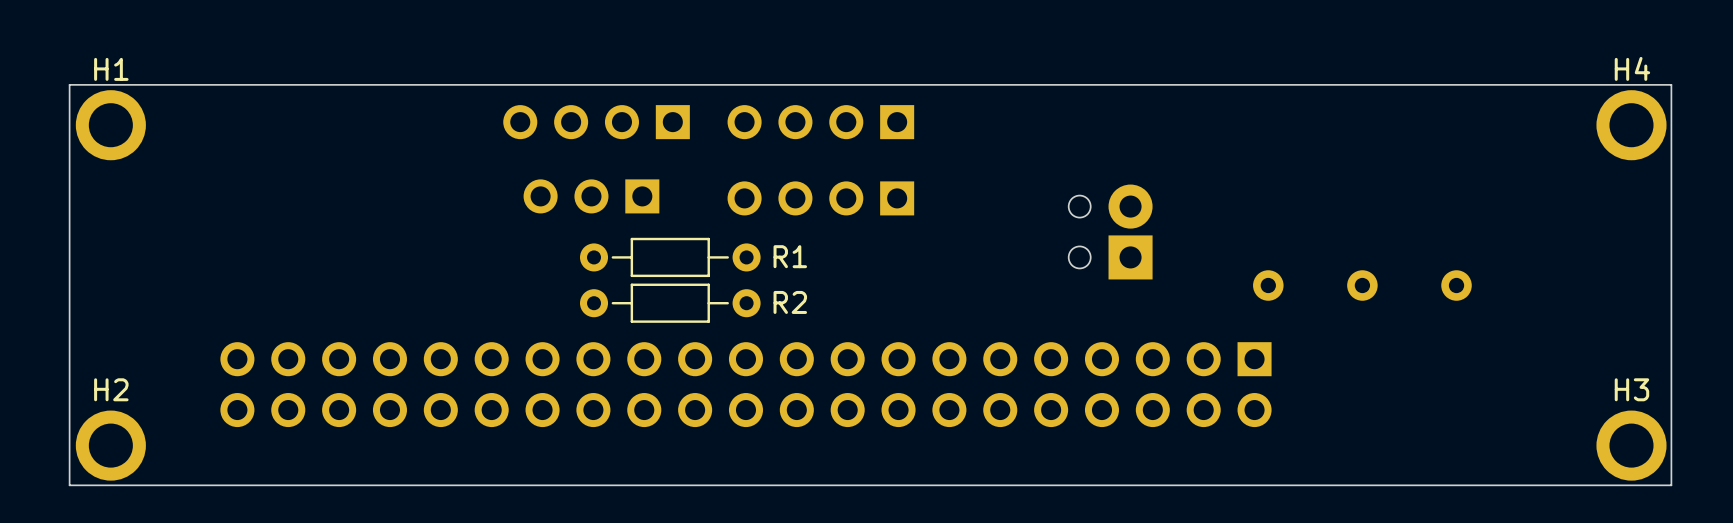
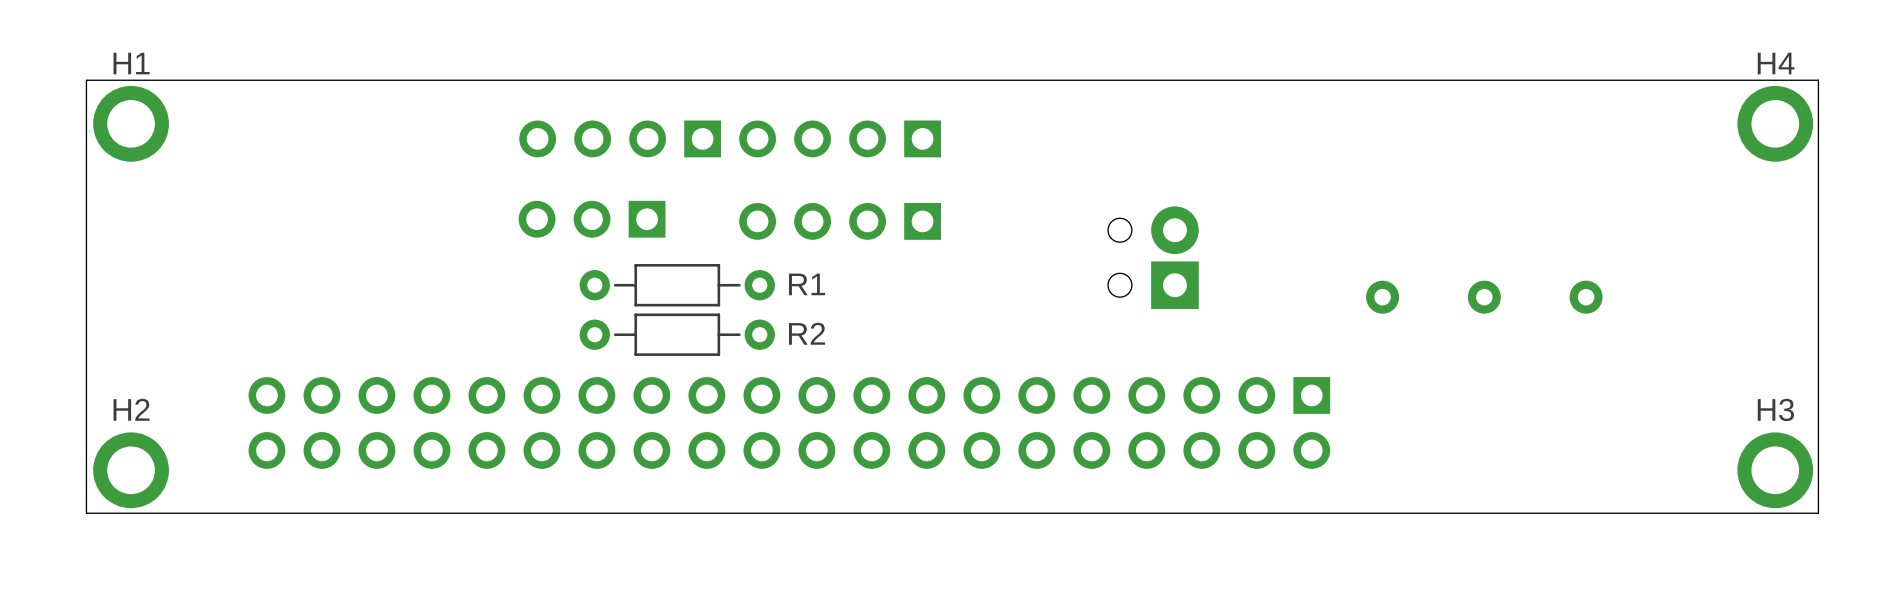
part position: (596, 122) -> (620, 138)
part: (820, 122) -> none
part: none -> (840, 138)
part position: (591, 196) -> (592, 219)
part: (820, 198) -> none
part: none -> (840, 221)
part position: (1110, 232) -> (1153, 257)
R1 position: (670, 257) -> (677, 285)
R2 position: (670, 303) -> (677, 334)
part: (745, 384) -> none
part: none -> (789, 422)

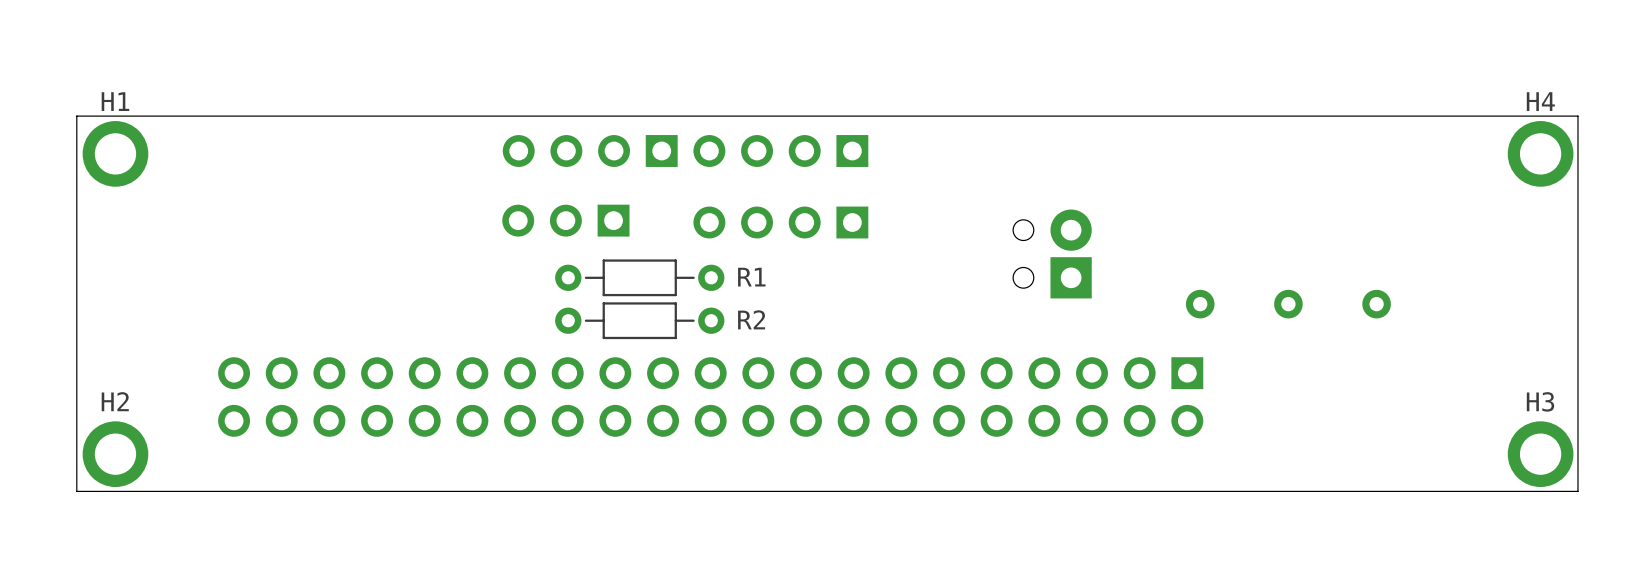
part: none -> (780, 151)
part position: (620, 138) -> (590, 151)
part: (840, 138) -> none
part: none -> (780, 222)
part position: (592, 219) -> (565, 220)
part: (840, 221) -> none
part position: (1153, 257) -> (1052, 253)
R1 position: (677, 285) -> (639, 277)
R2 position: (677, 334) -> (639, 320)
part: none -> (710, 397)
part: (789, 422) -> none

